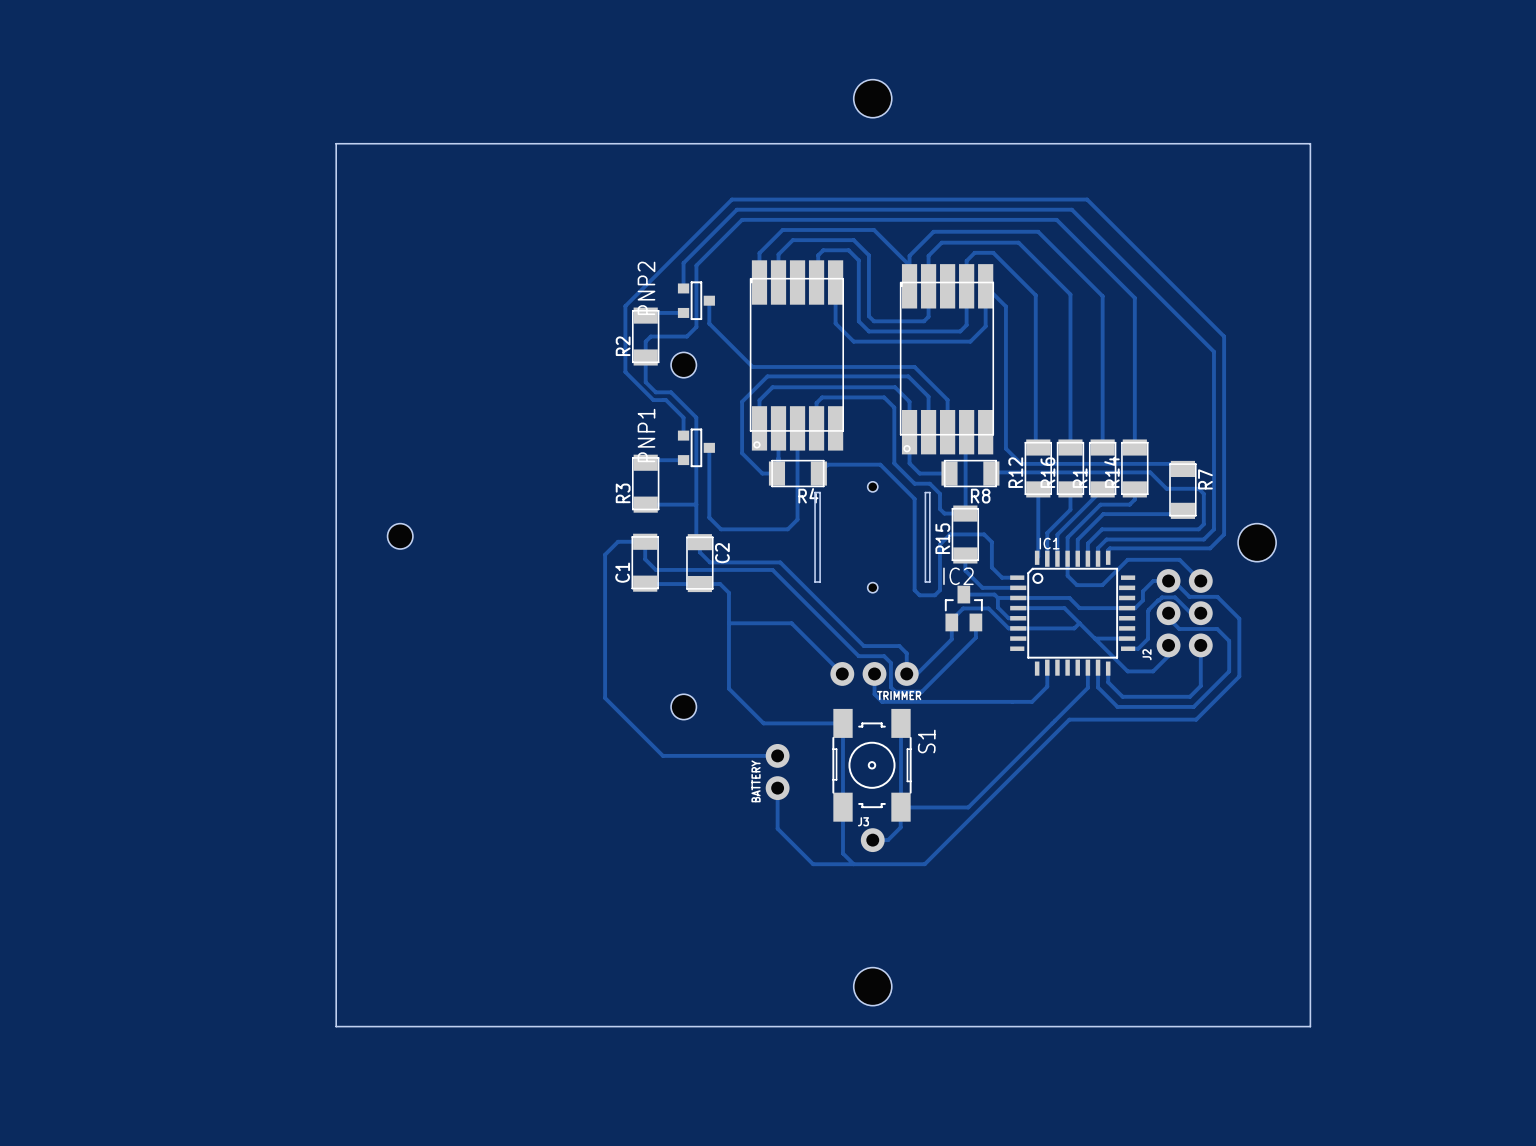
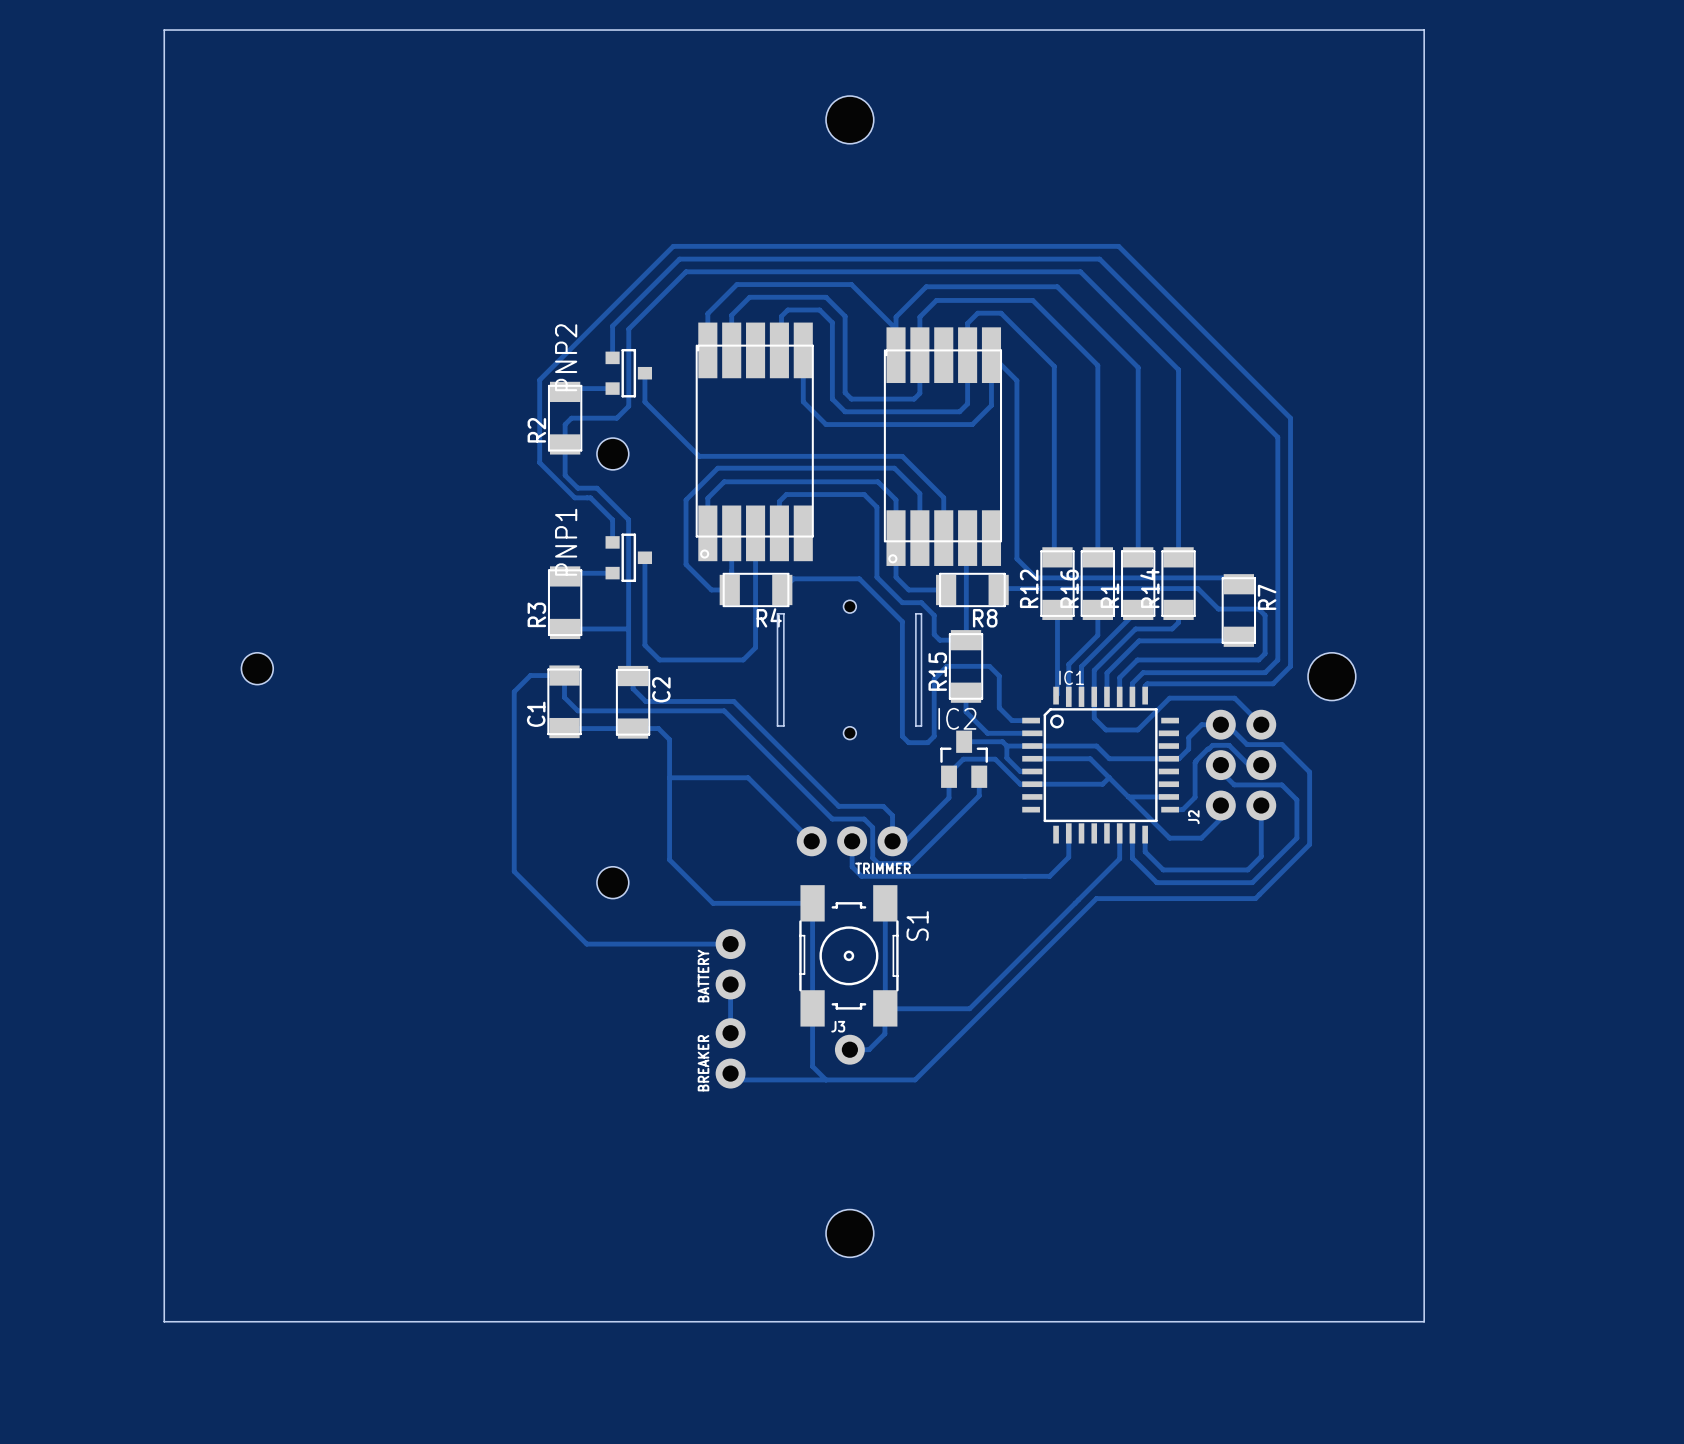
board edge: (336, 143) (1310, 143) (1310, 1026) (336, 1026) (336, 143) -> (164, 30) (164, 1321) (1424, 1321) (1424, 30) (164, 30)
track: (777, 826) (813, 864) -> (730, 1073) (736, 1079) (775, 1079)
BREAKER: none -> (730, 1053)

